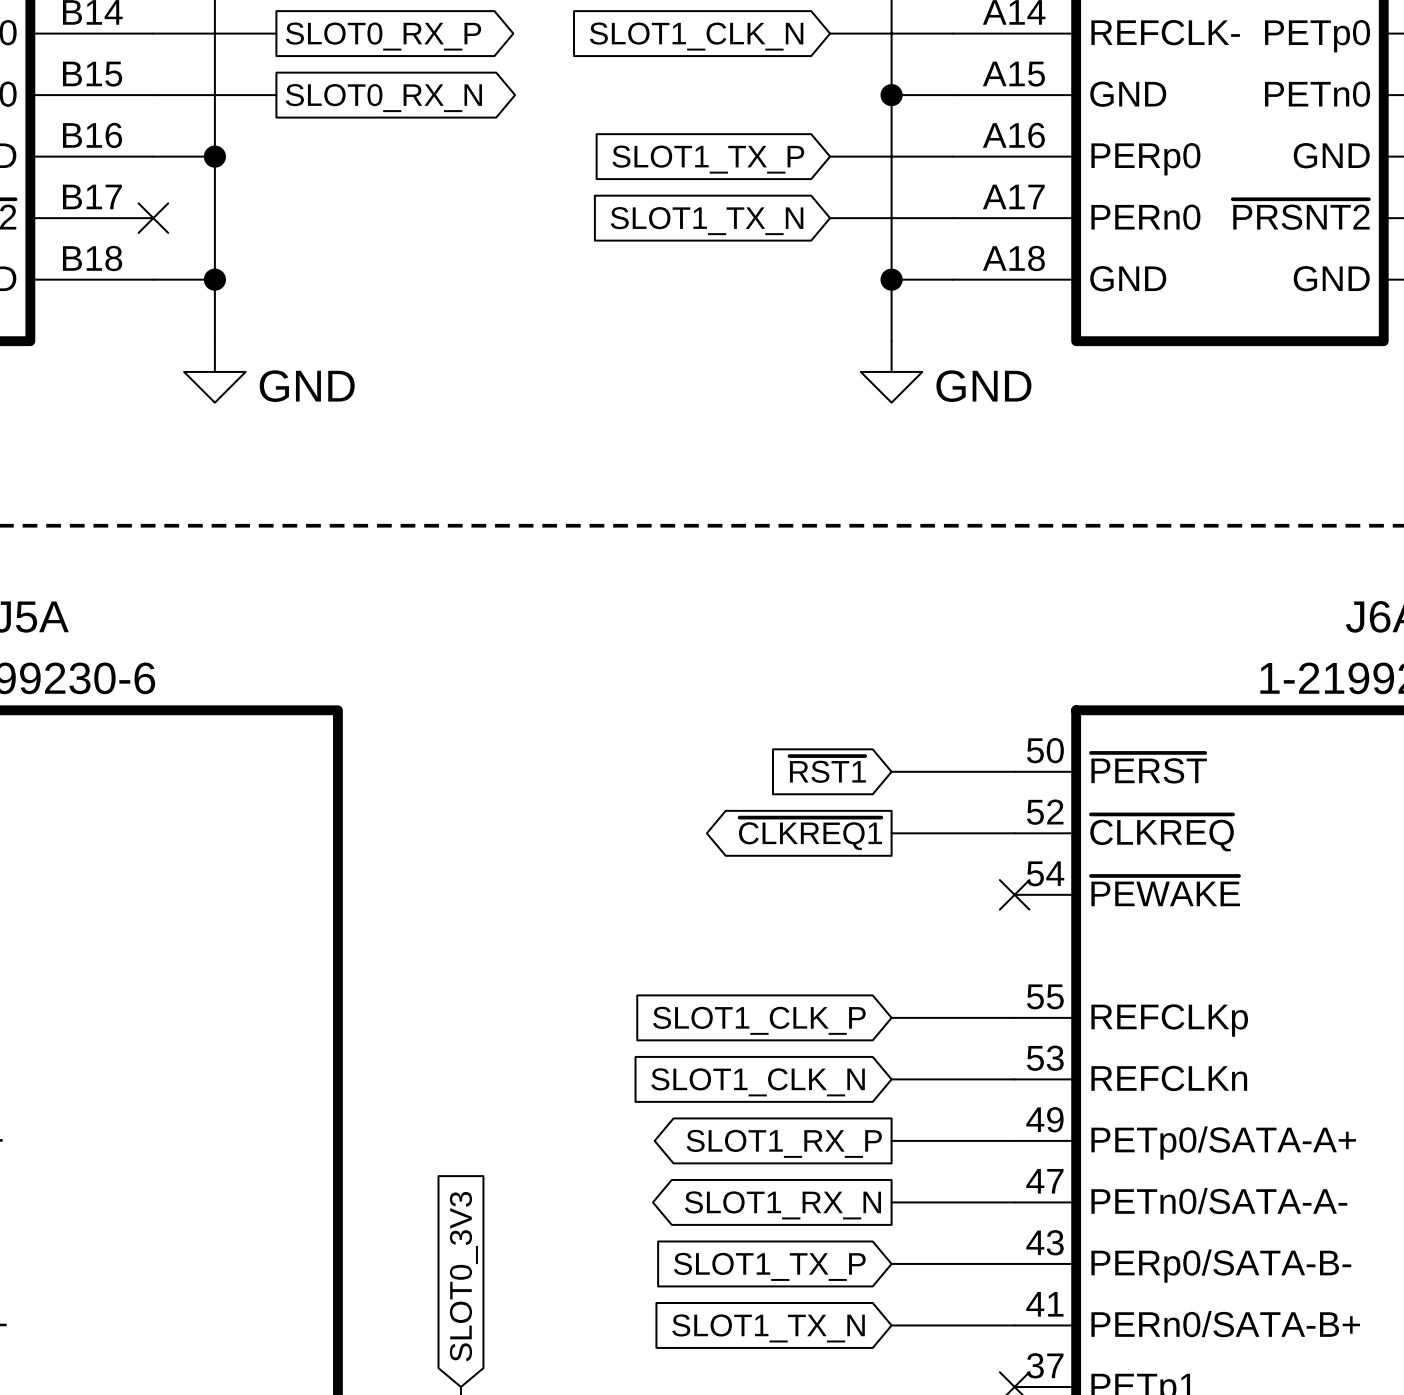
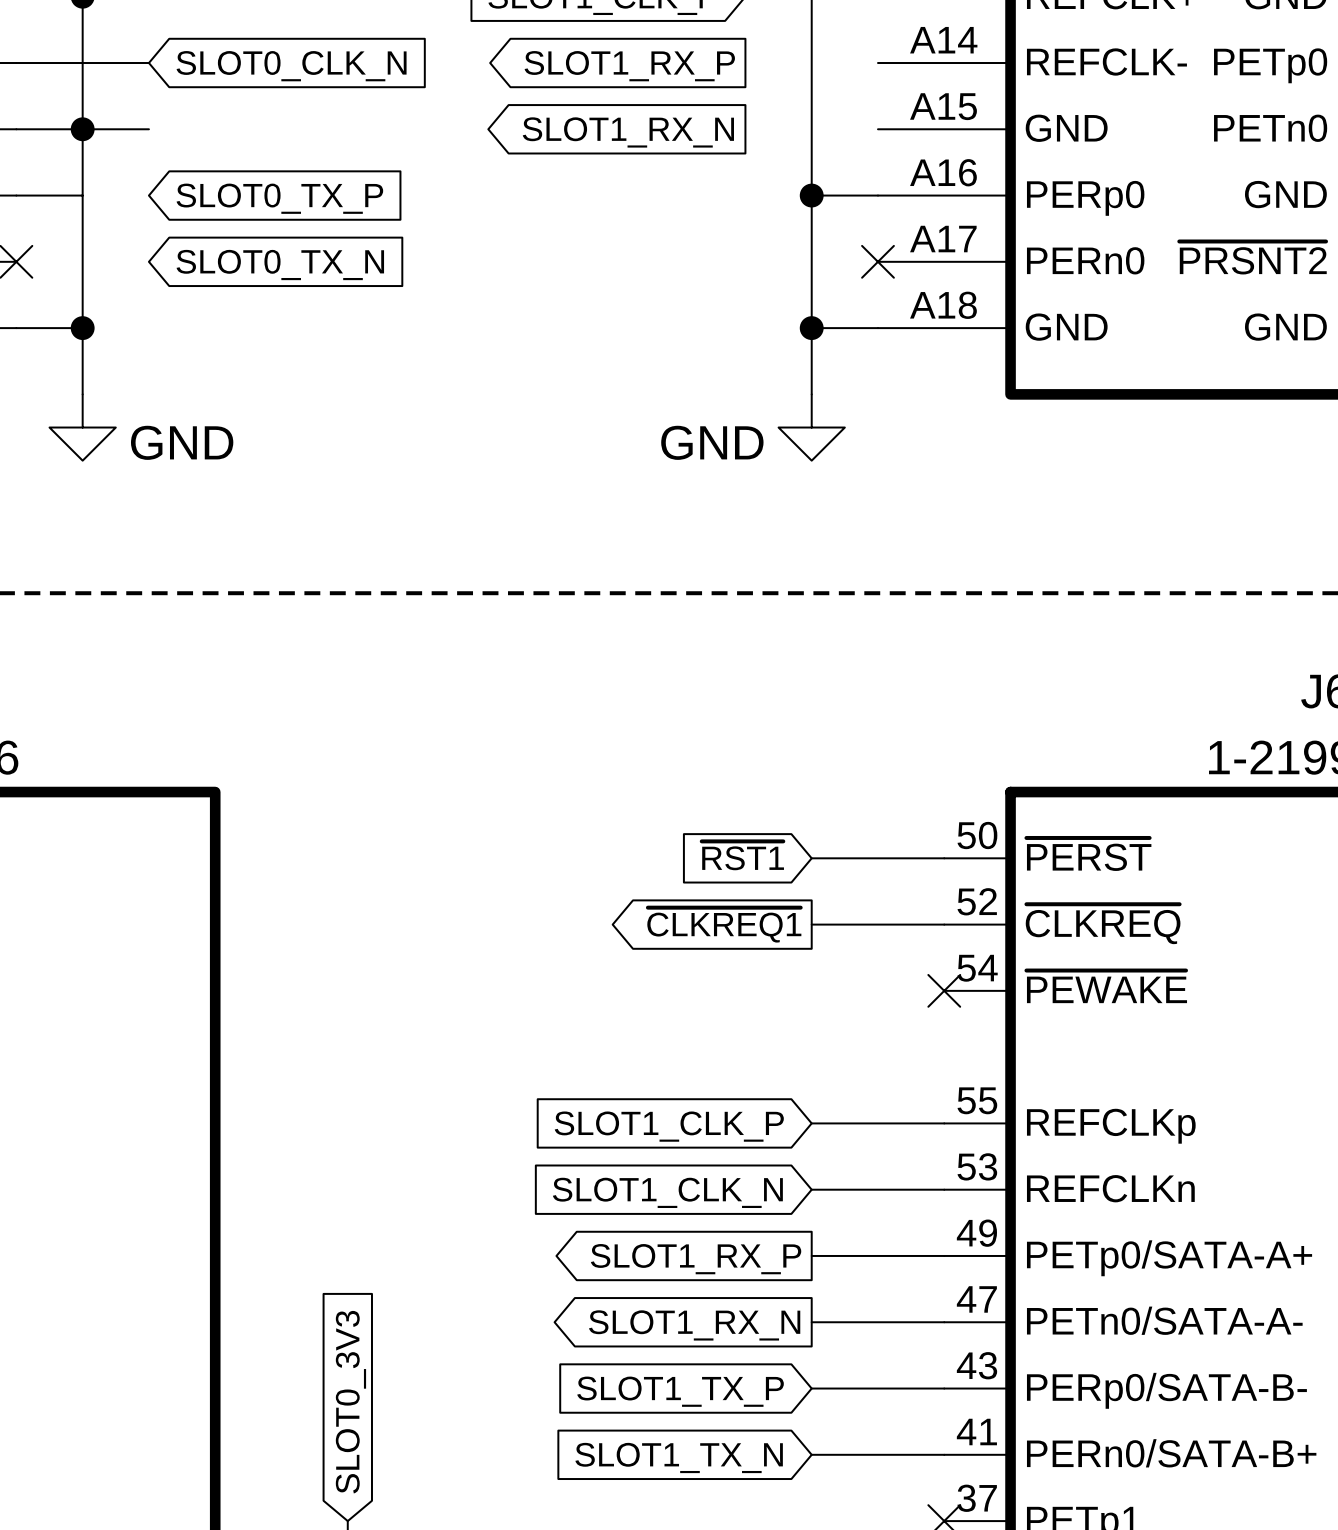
wire: (830, 33) (953, 33) -> none
global label shape: output (383, 36) -> input (291, 66)
global label: SLOT0_RX_P (383, 36) -> SLOT0_CLK_N (291, 66)
global label shape: input (696, 36) -> output (629, 66)
global label: SLOT1_CLK_N (696, 36) -> SLOT1_RX_P (629, 66)
wire: (891, 95) (953, 95) -> none
junction position: (891, 95) -> (811, 195)
global label: SLOT0_RX_N (383, 98) -> none
global label: none -> SLOT1_RX_N (628, 132)
junction position: (214, 156) -> (82, 129)
wire: (830, 156) (891, 156) -> none
global label: none -> SLOT0_TX_P (279, 198)
global label: SLOT1_TX_P (708, 159) -> none
wire: (830, 218) (953, 218) -> none
no-connect mark: none -> (877, 261)
global label: none -> SLOT0_TX_N (280, 265)
global label: SLOT1_TX_N (707, 221) -> none
power symbol text position: GND (983, 386) -> GND (712, 442)

